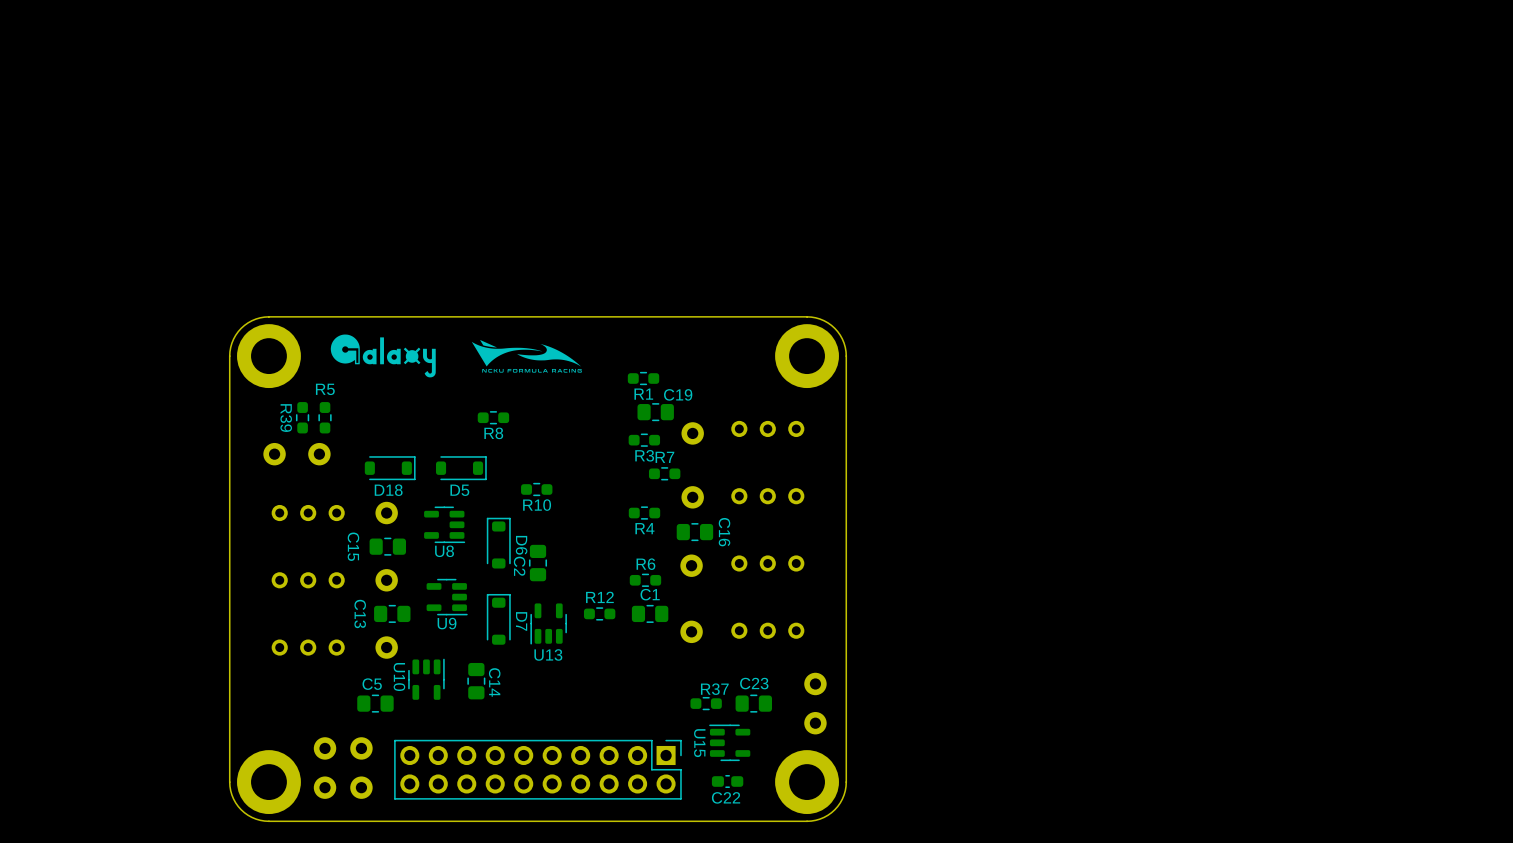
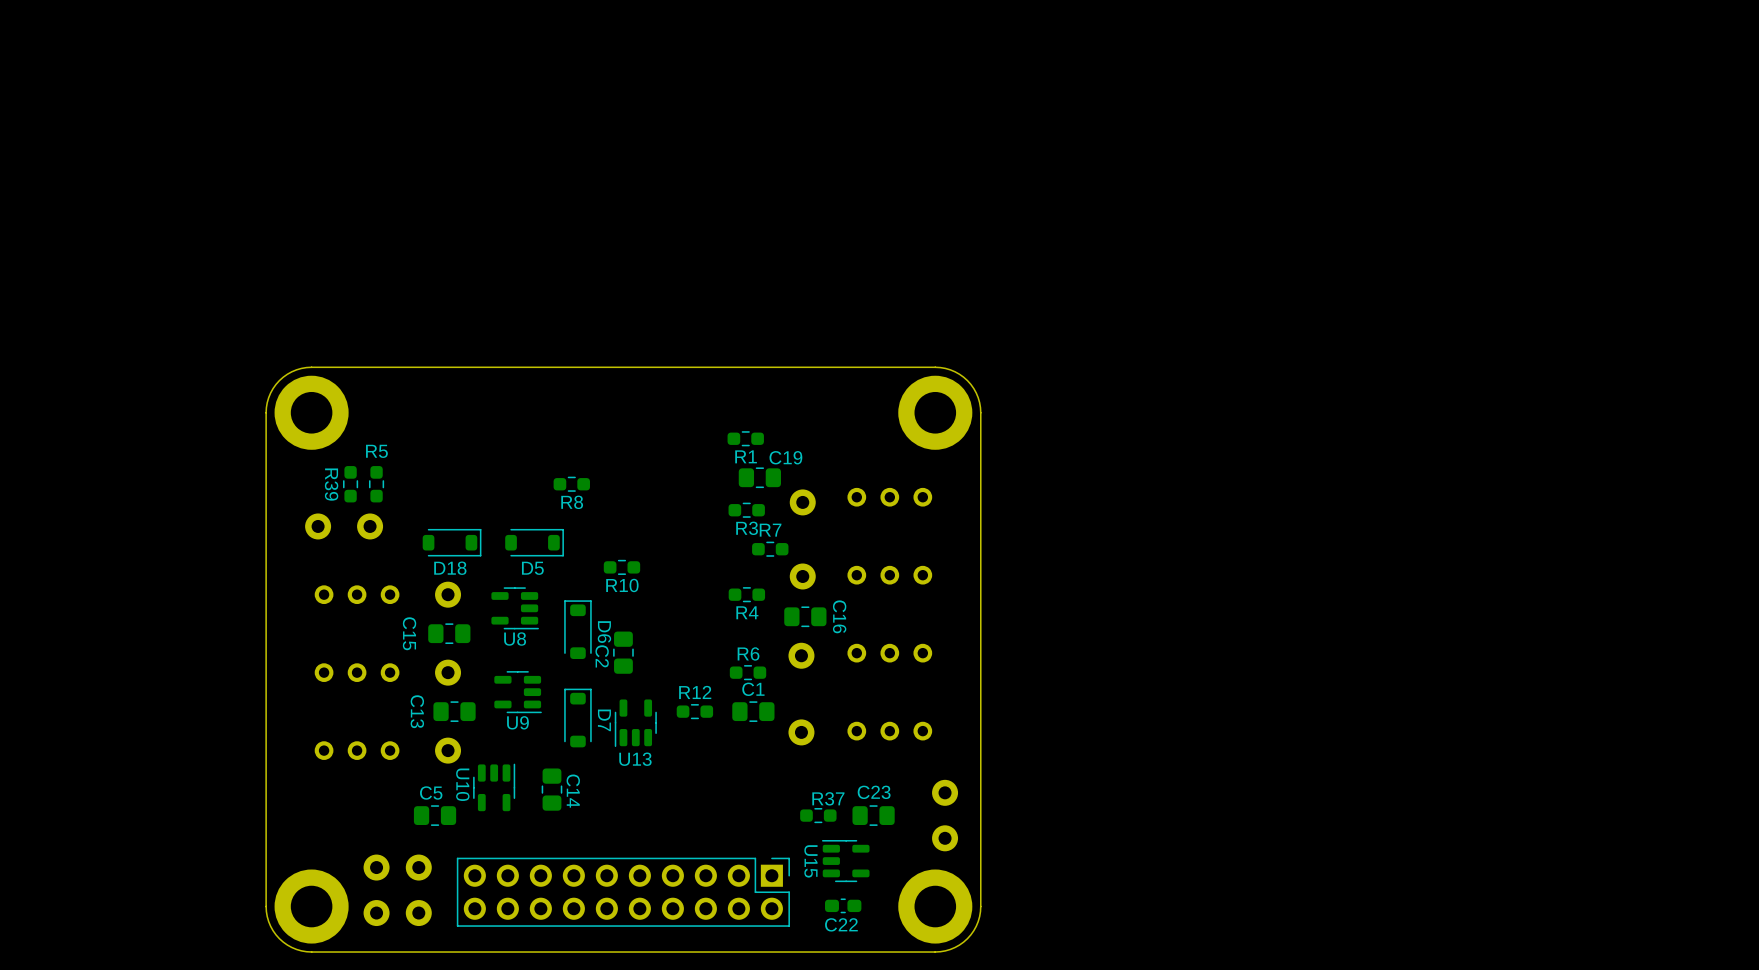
drawing: [330, 334, 436, 378] -> none
drawing: [471, 339, 582, 373] -> none

